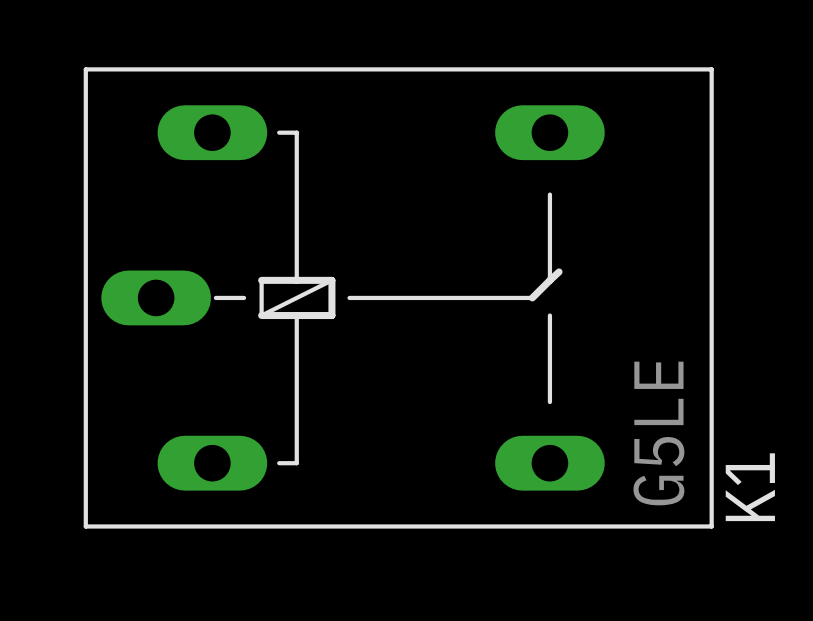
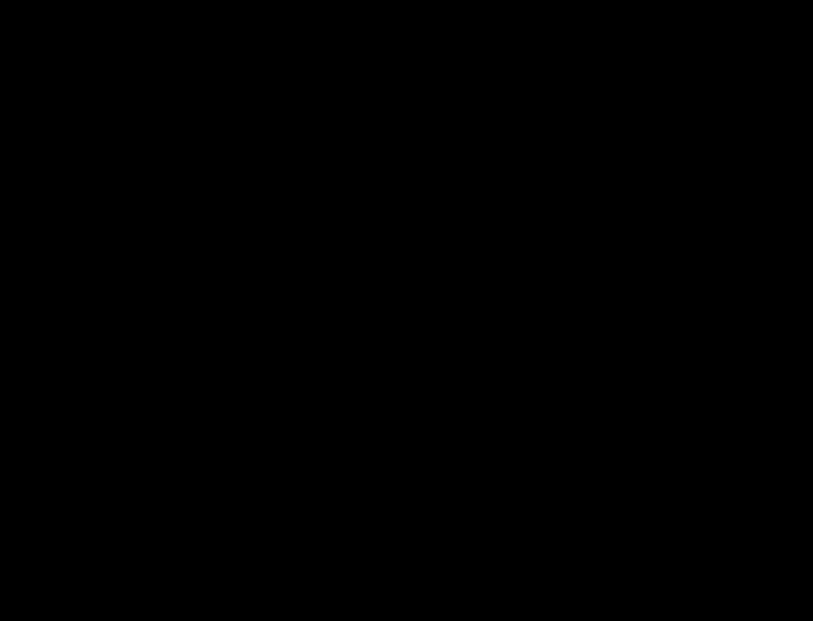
K1: G5LE (398, 297) -> none

